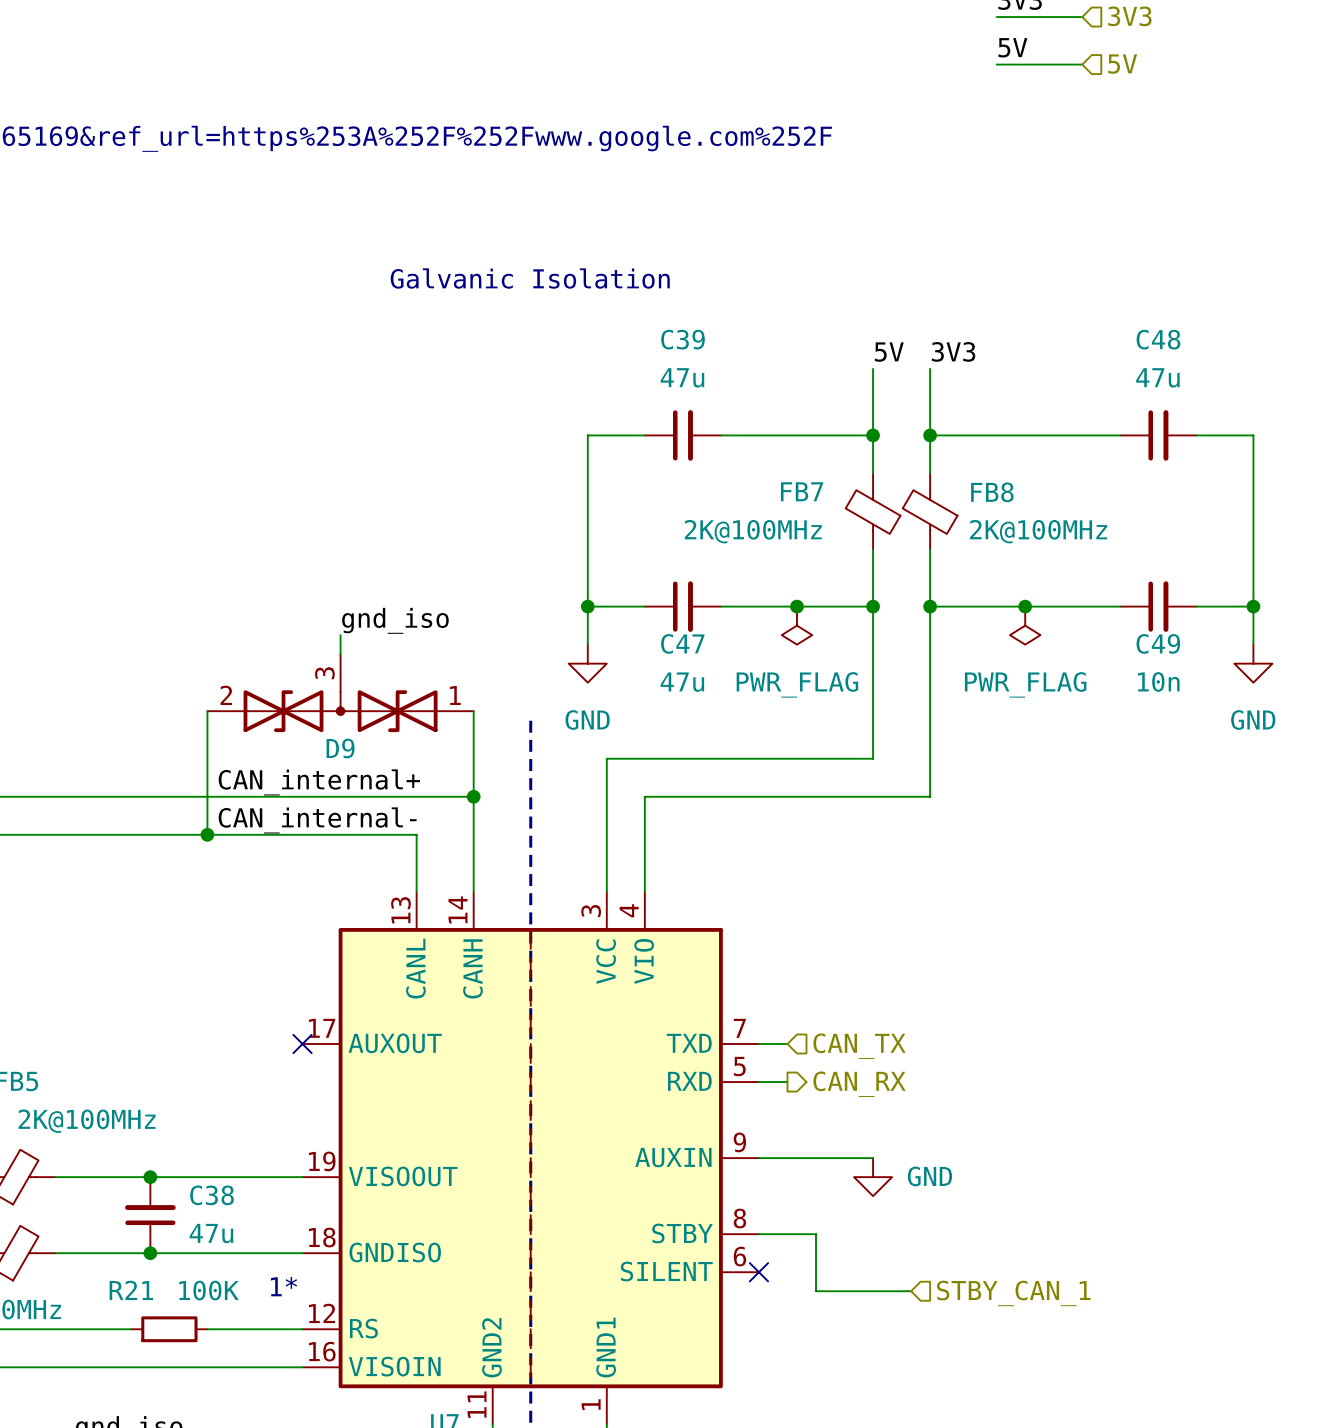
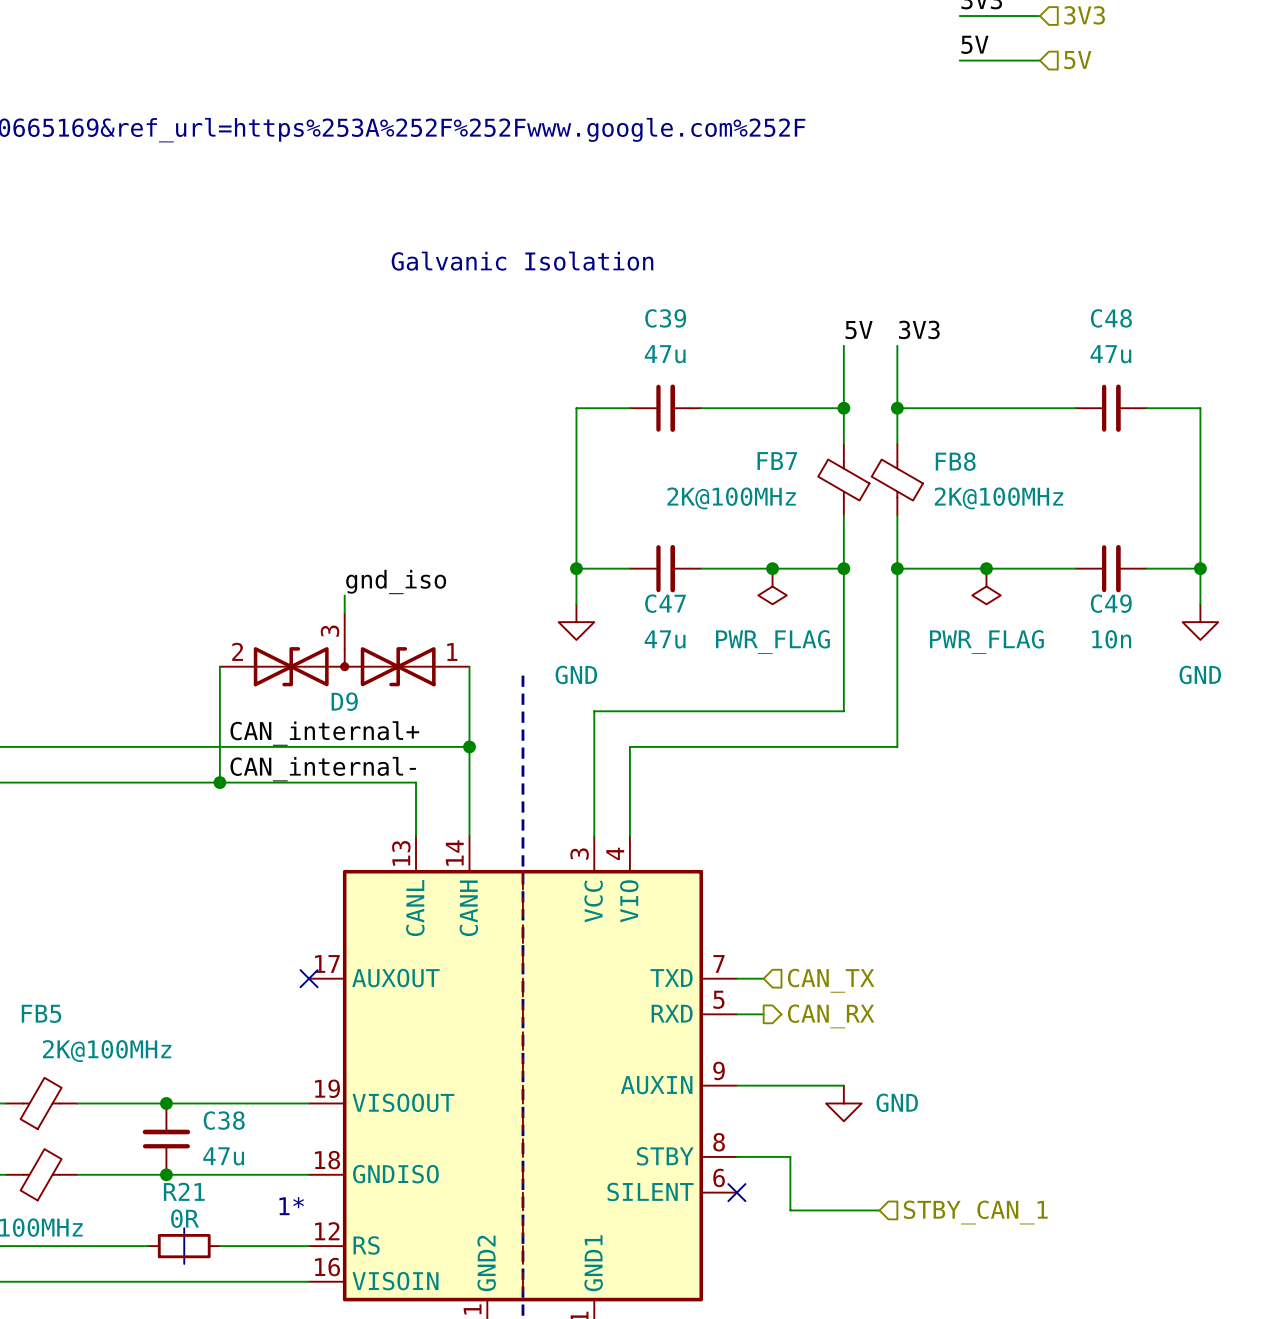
R21 name position: R21 (131, 1290) -> R21 (184, 1191)
R21 value: 100K (208, 1290) -> 0R (185, 1218)
line: none -> (184, 1228) (184, 1263)

